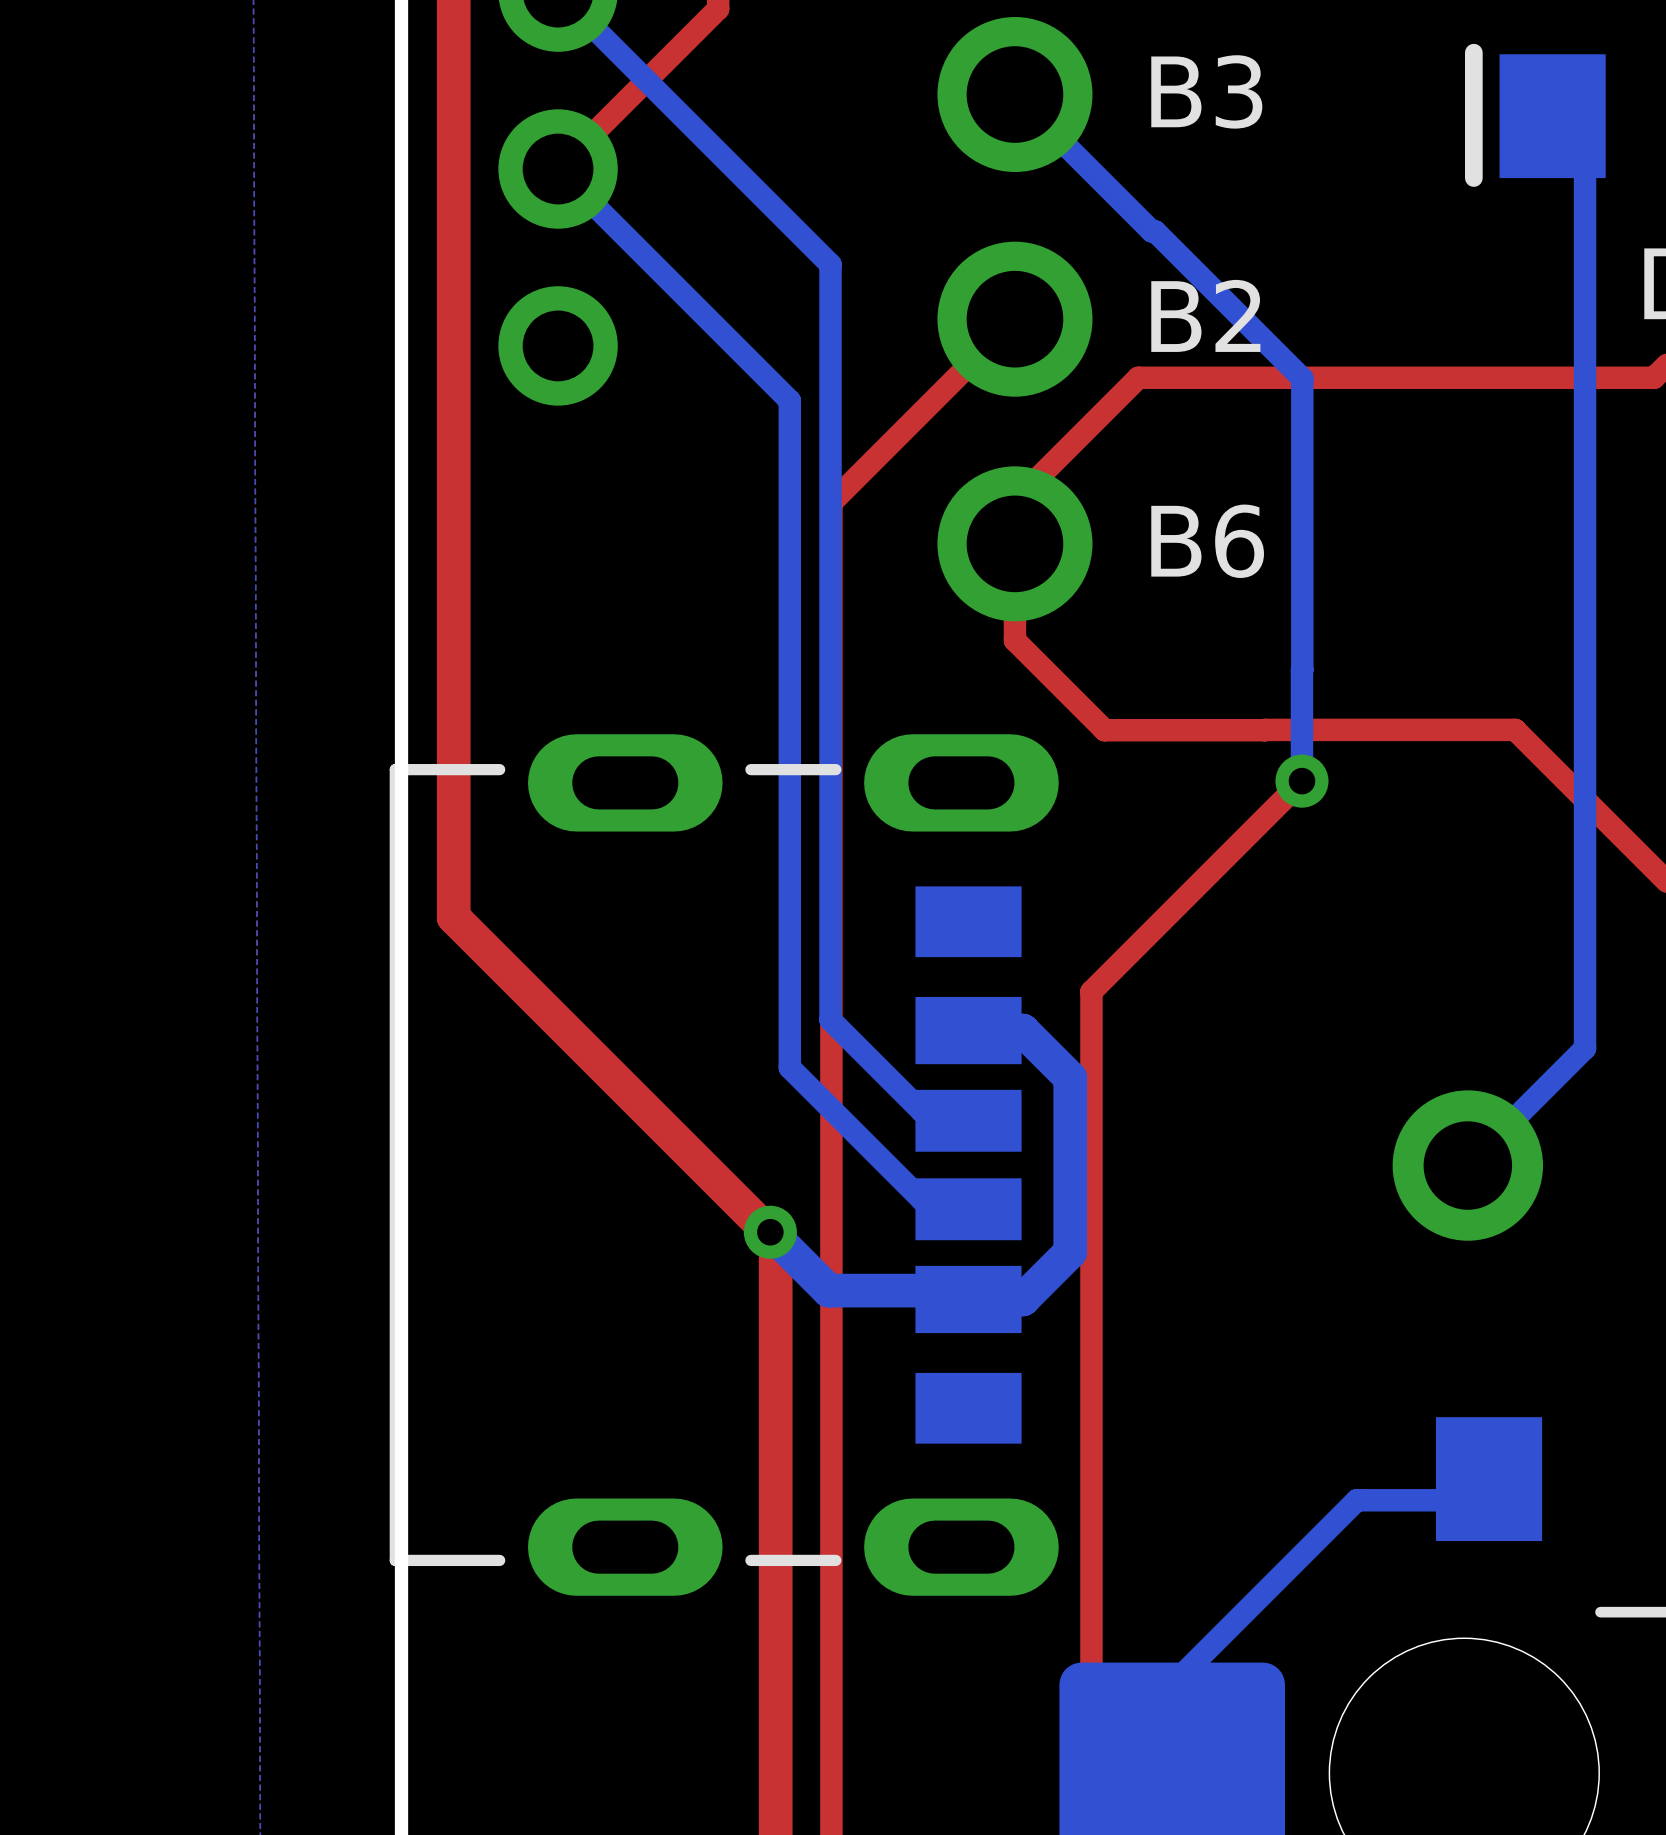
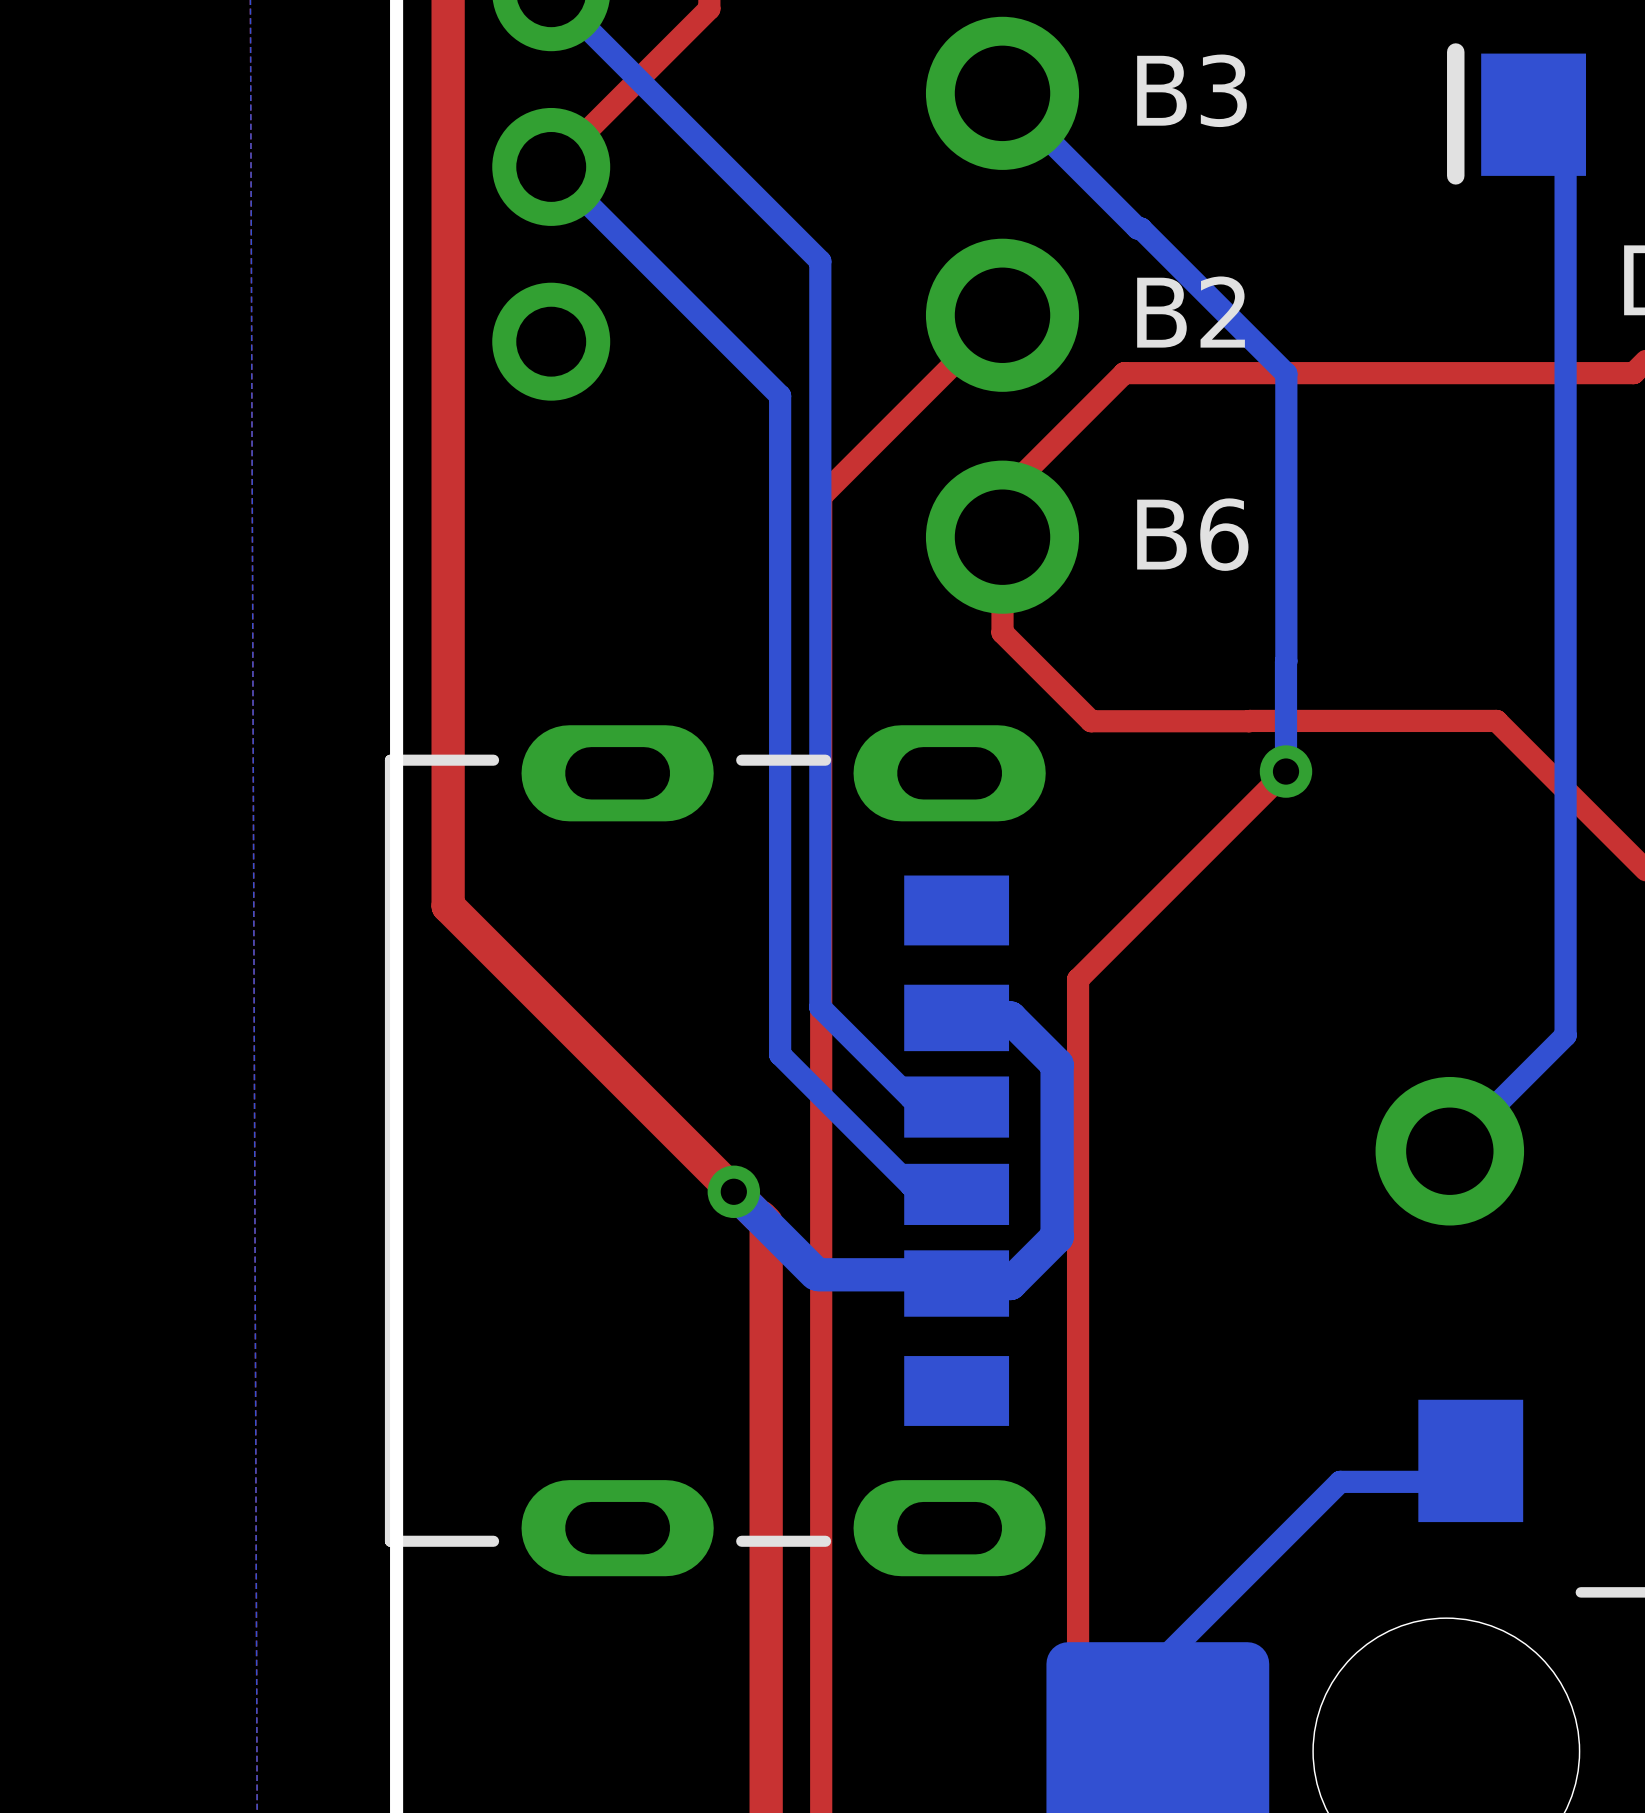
bottom track: (770, 1232) (828, 1290) -> (733, 1191) (815, 1273)
via position: (770, 1232) -> (733, 1191)

